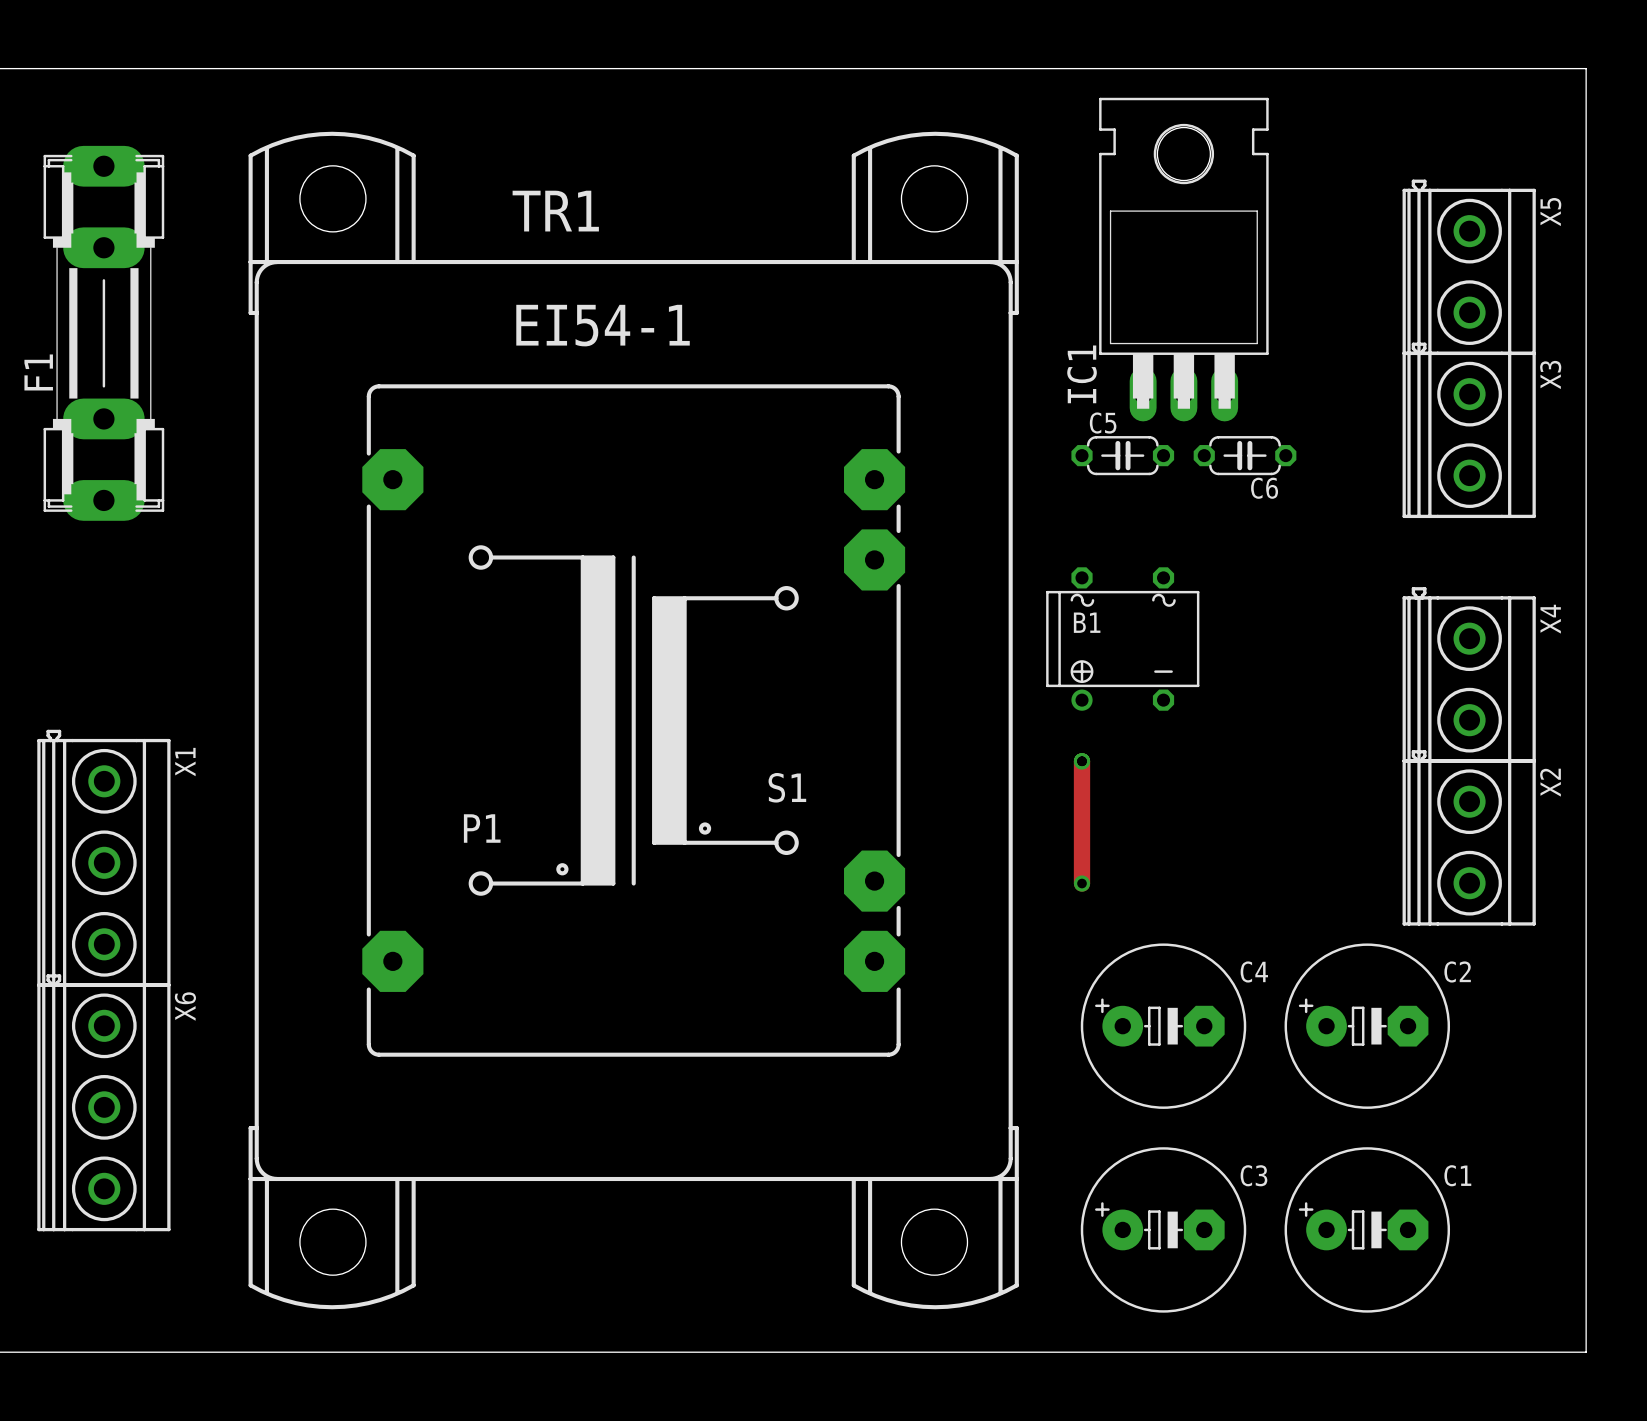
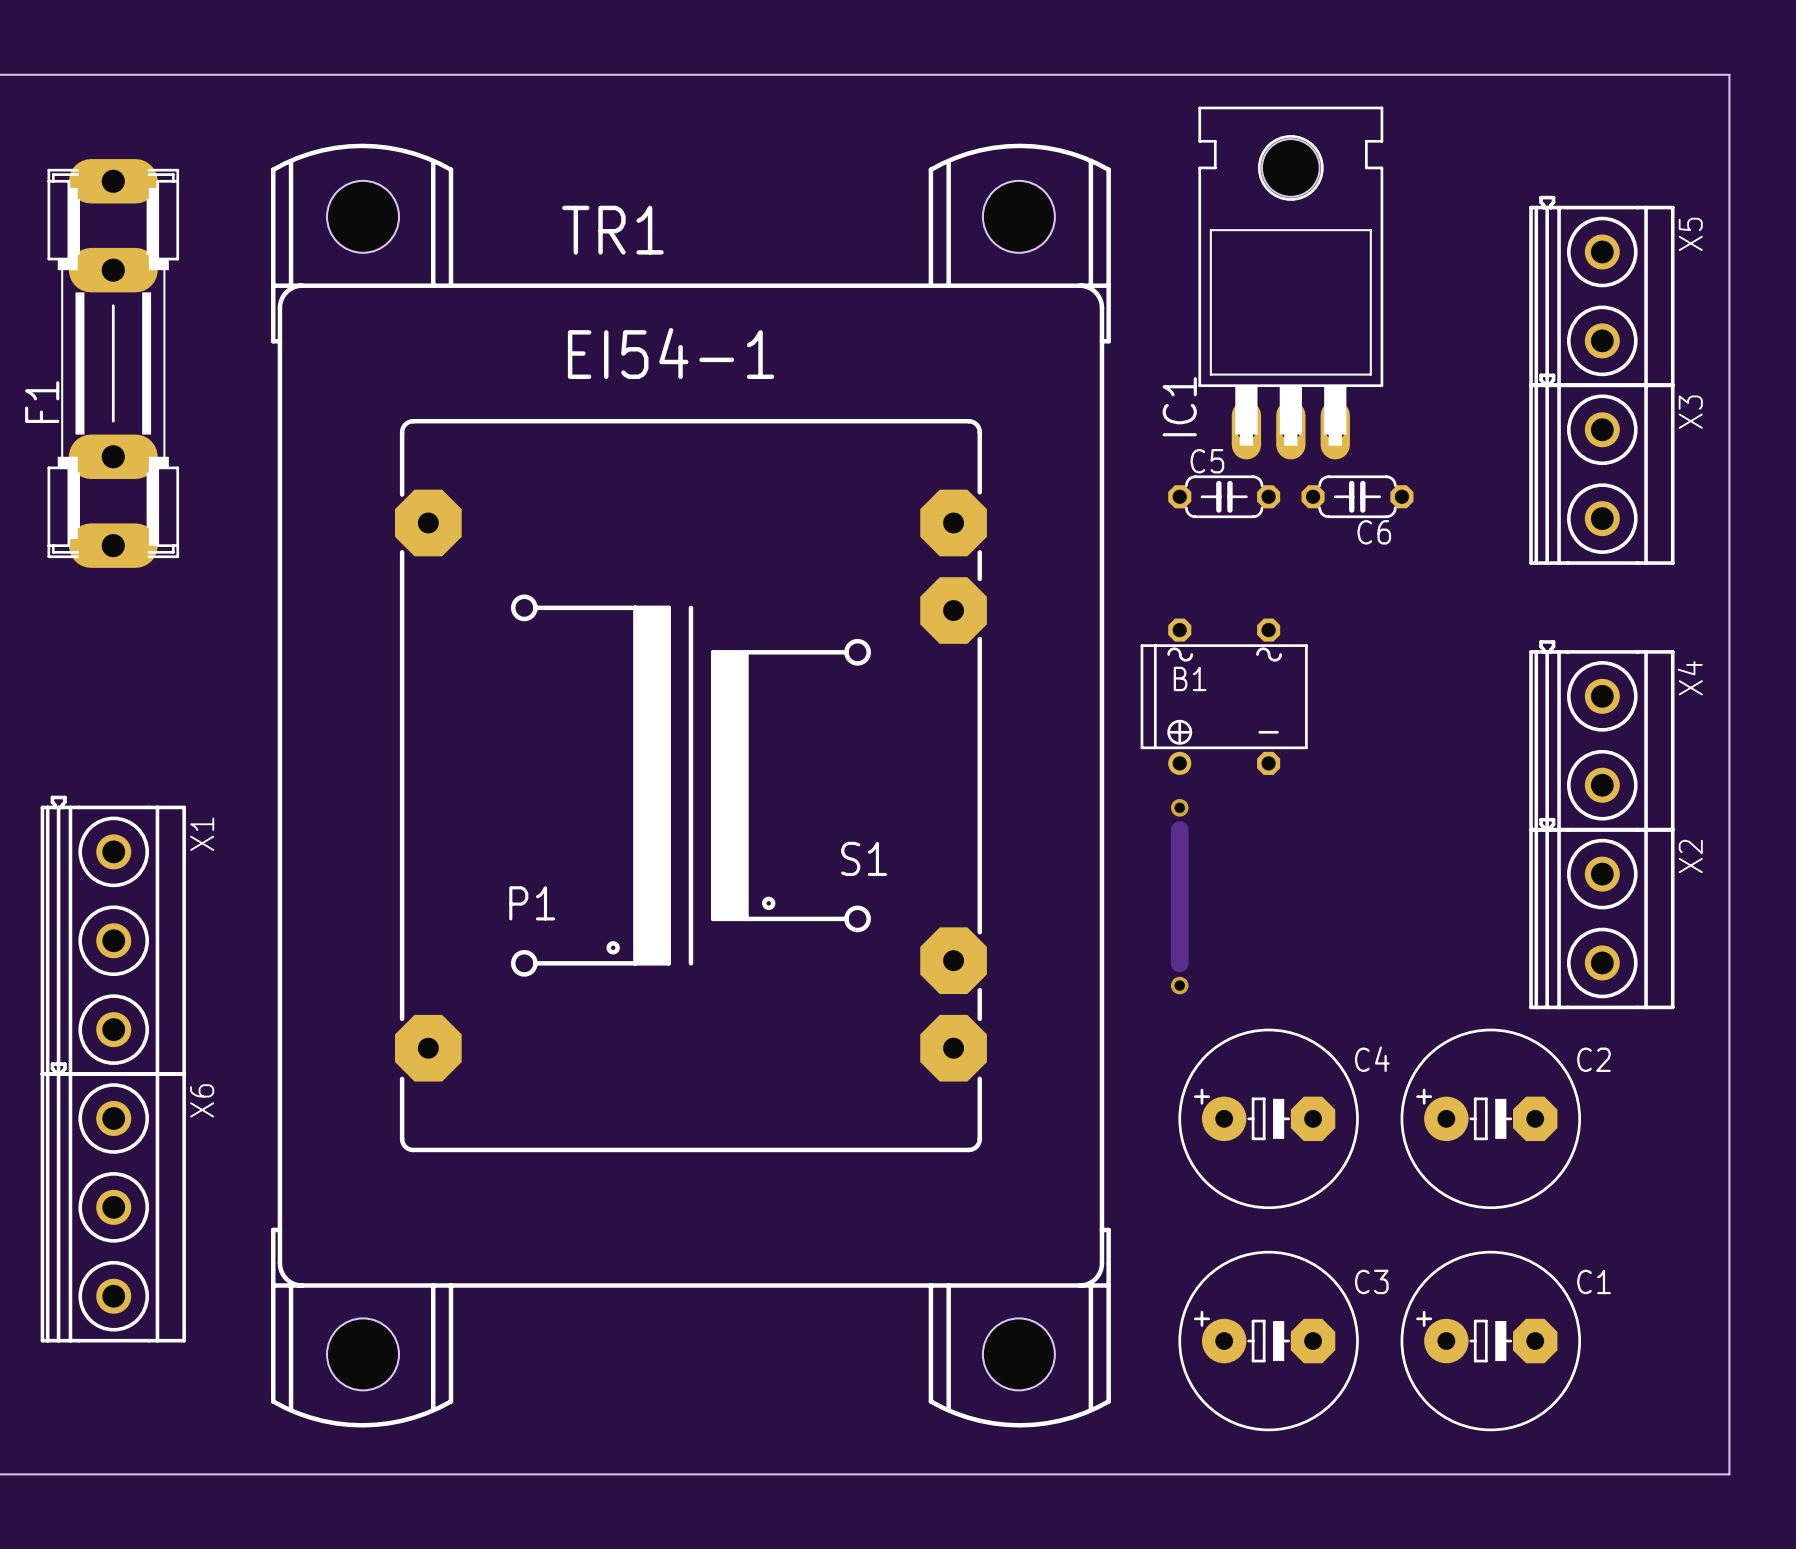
via position: (1082, 761) -> (1179, 807)
via position: (1082, 883) -> (1179, 985)

